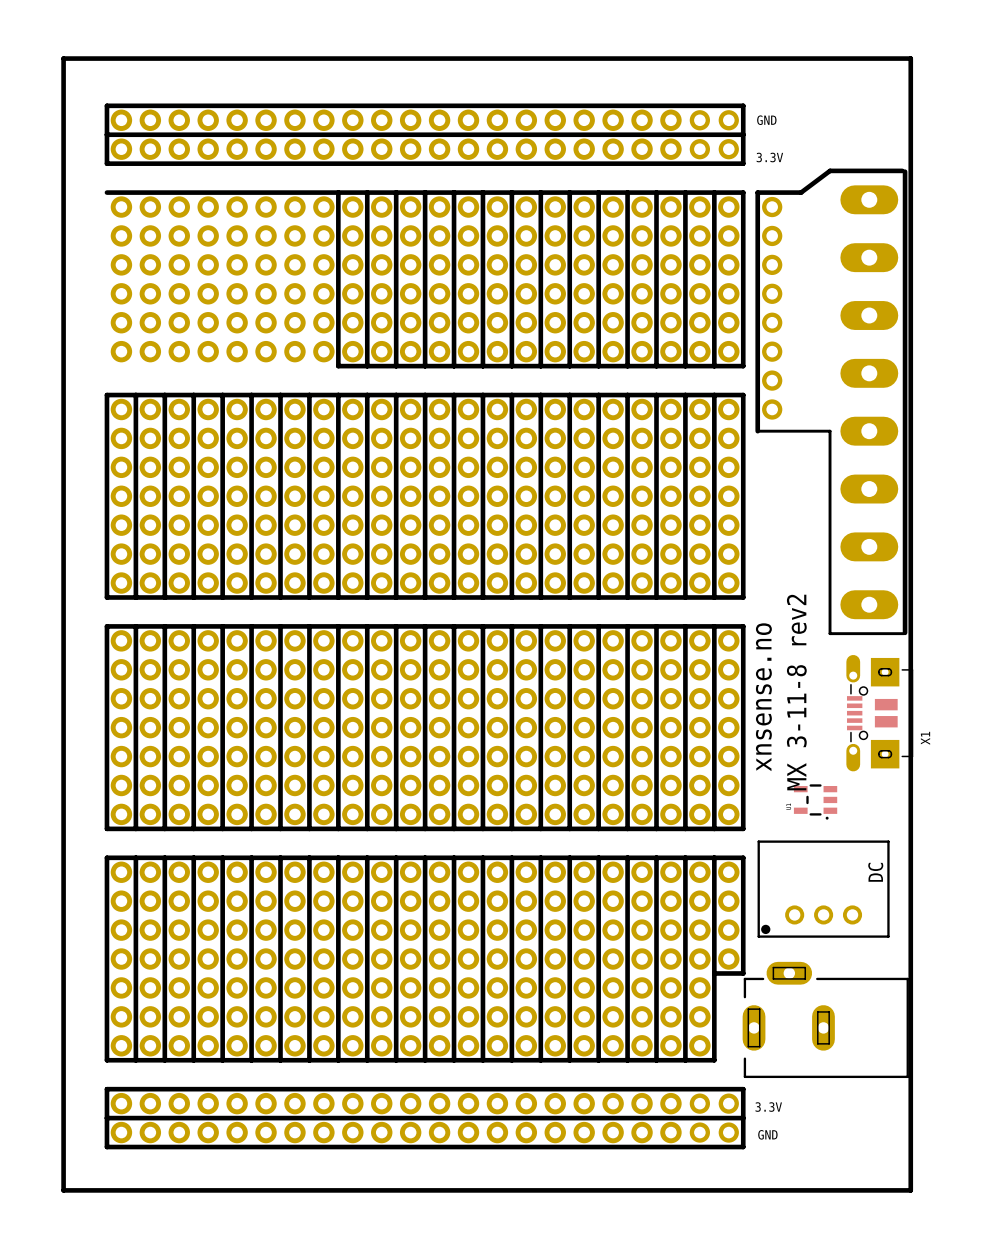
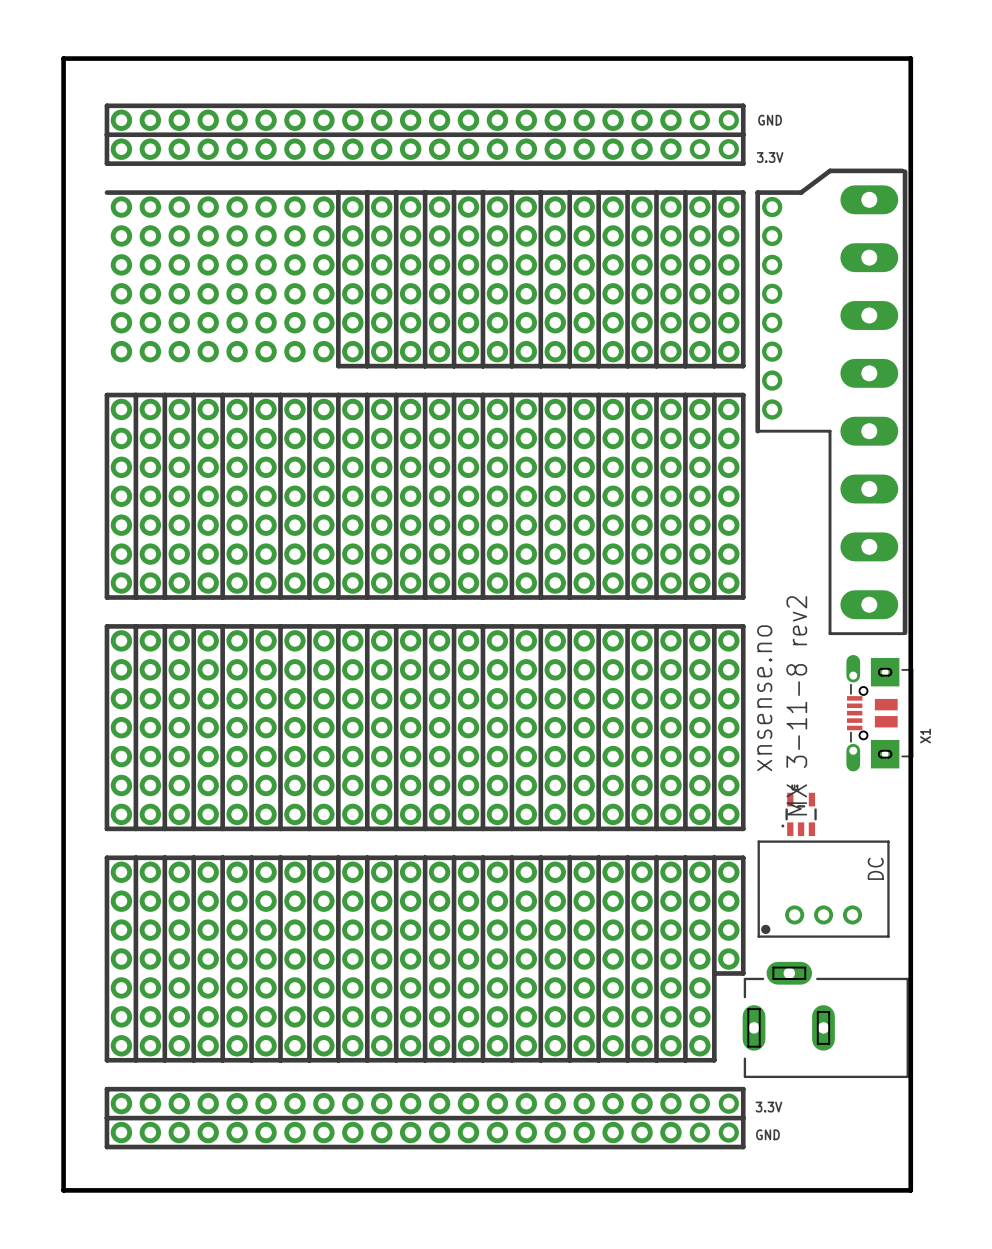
part rotation: 0° (815, 801) -> 90° clockwise (799, 814)

